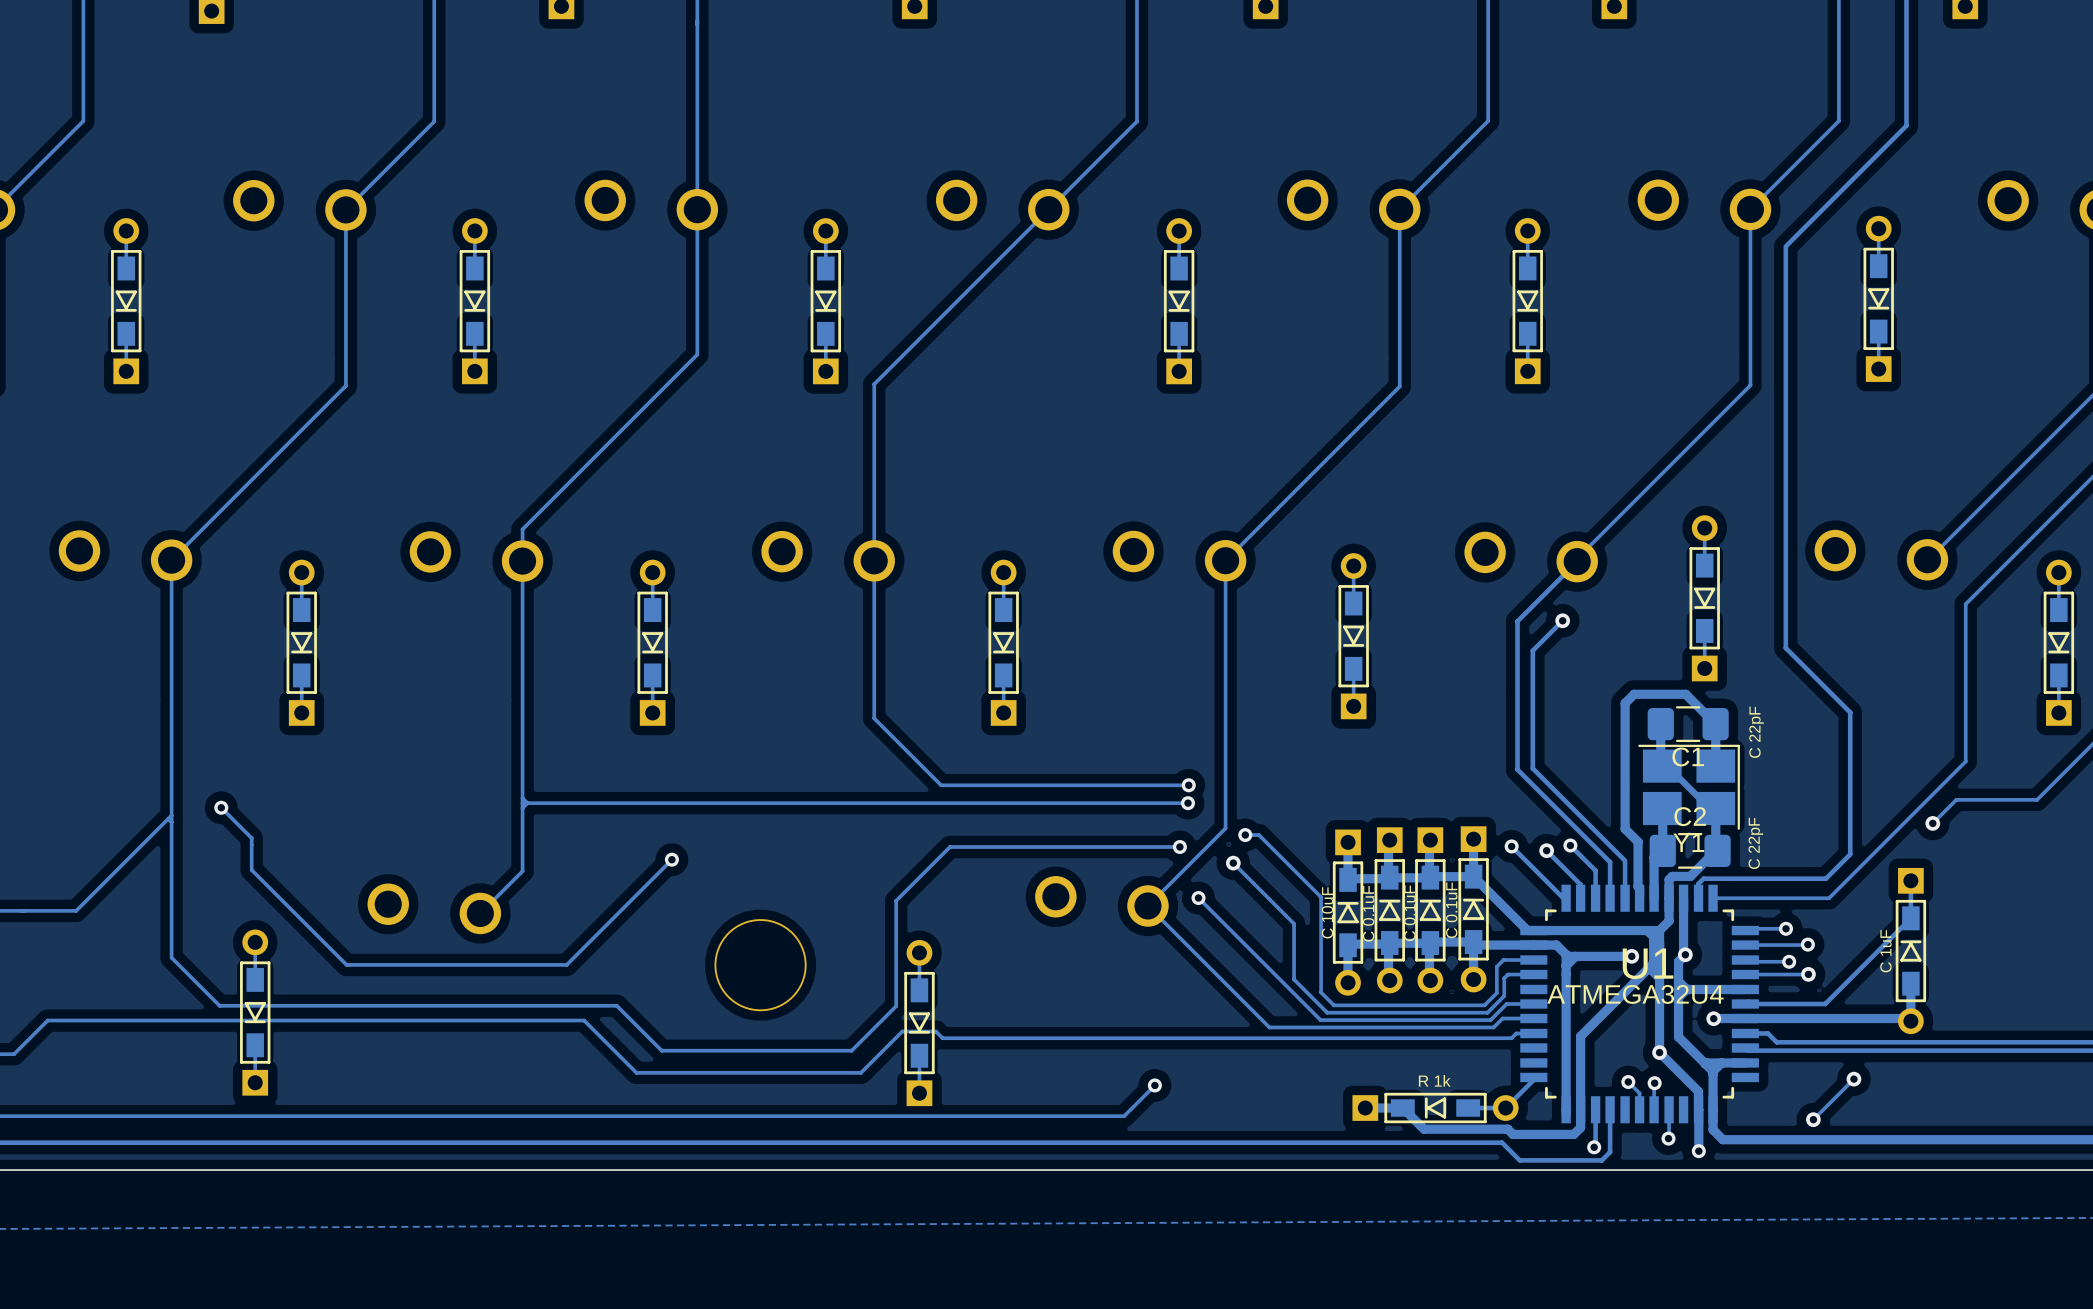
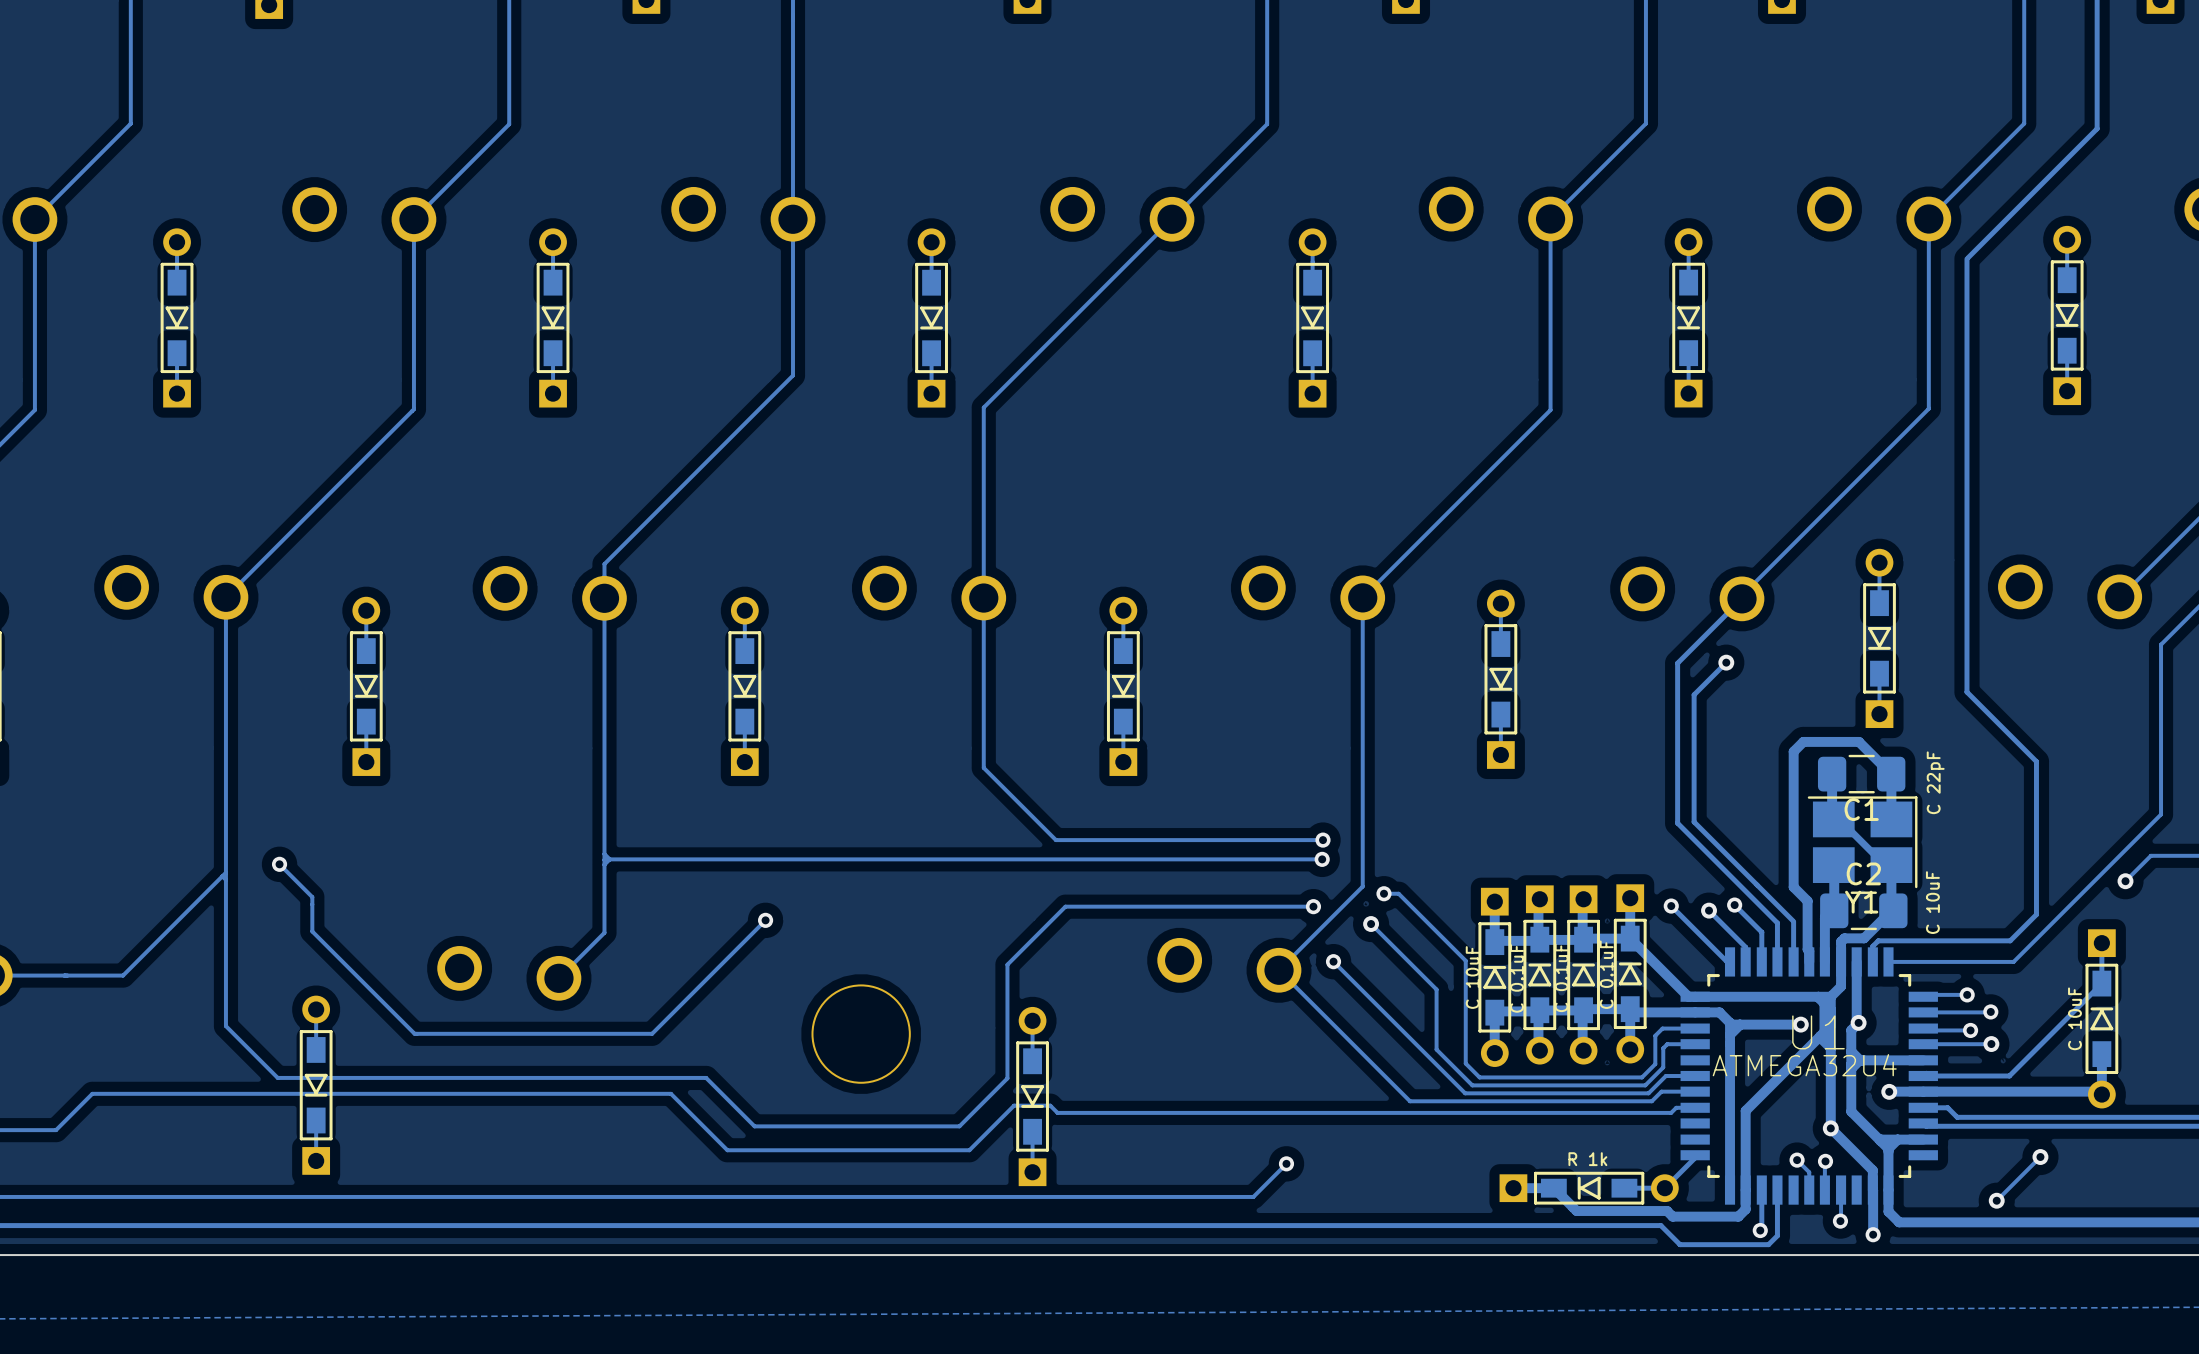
text: C 22pF (1755, 843) -> C 10uF (1932, 902)
text: C 1uF (1885, 951) -> C 10uF (2074, 1018)

